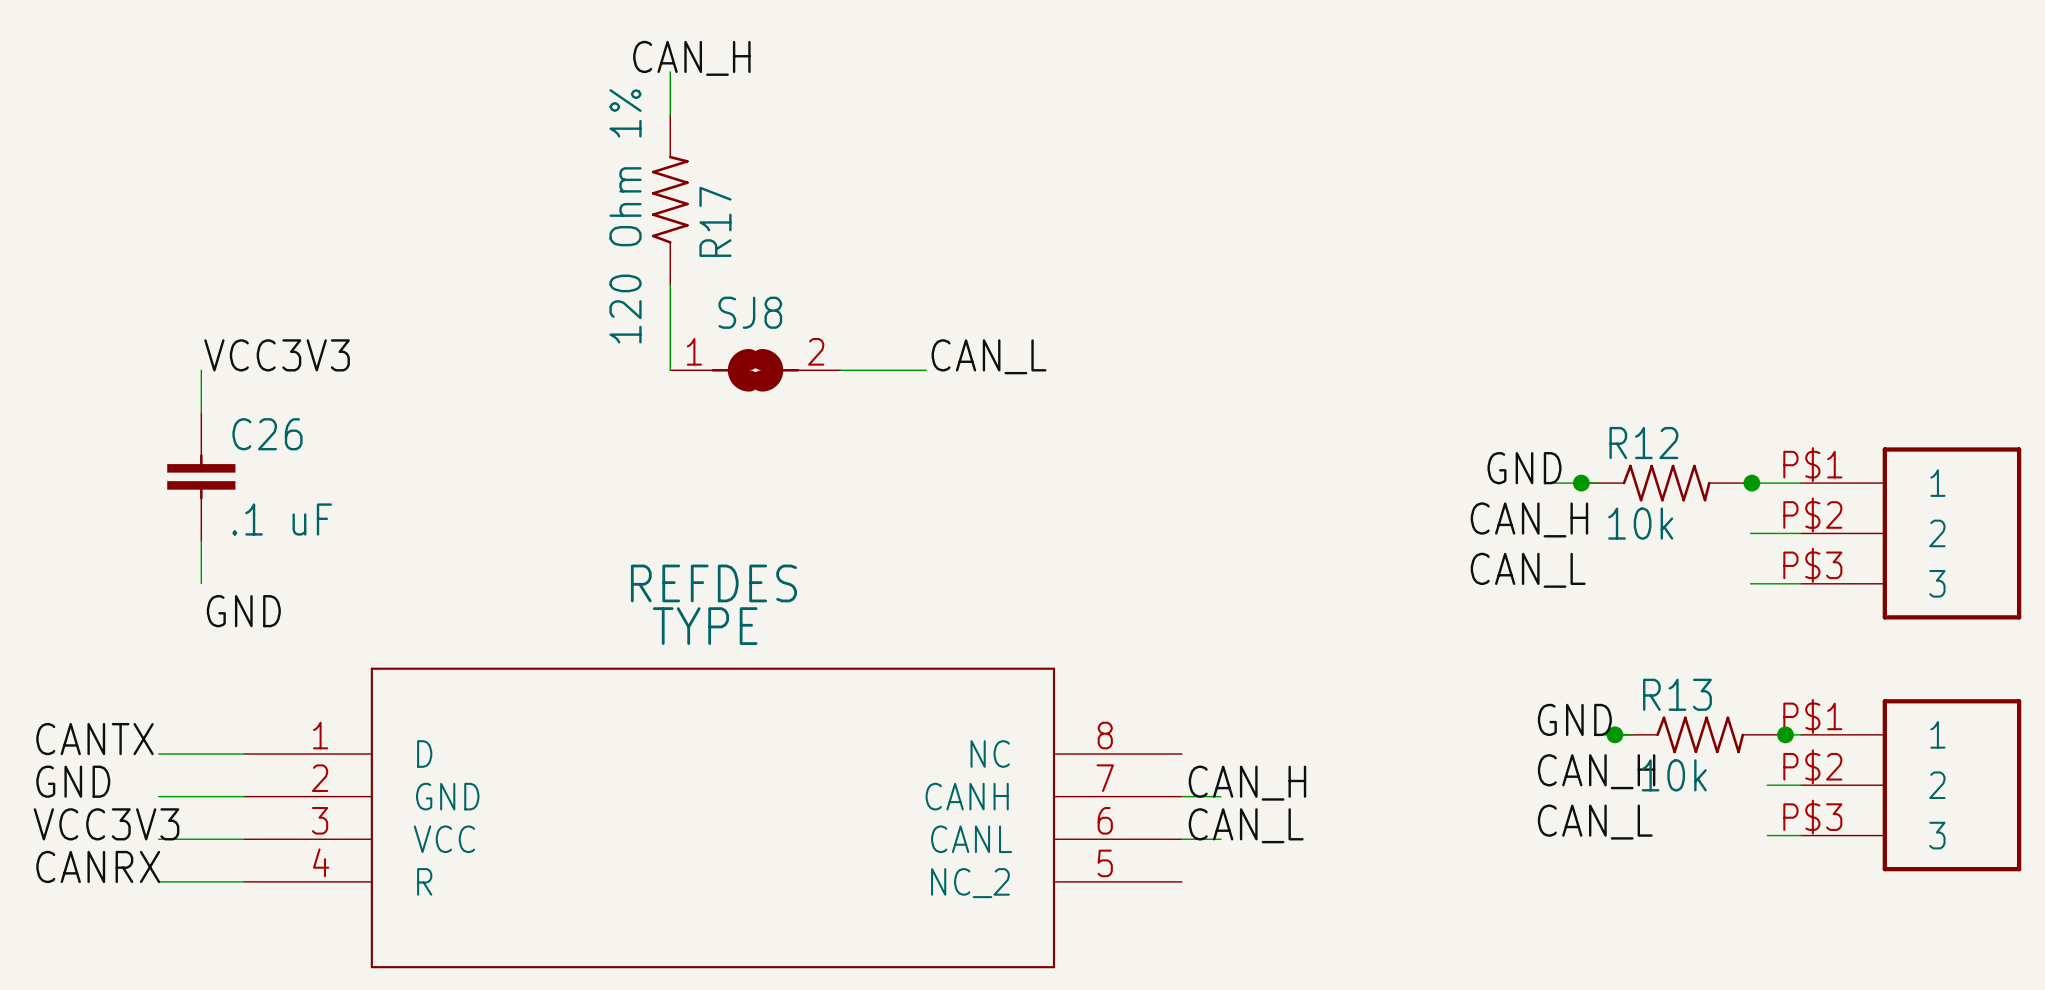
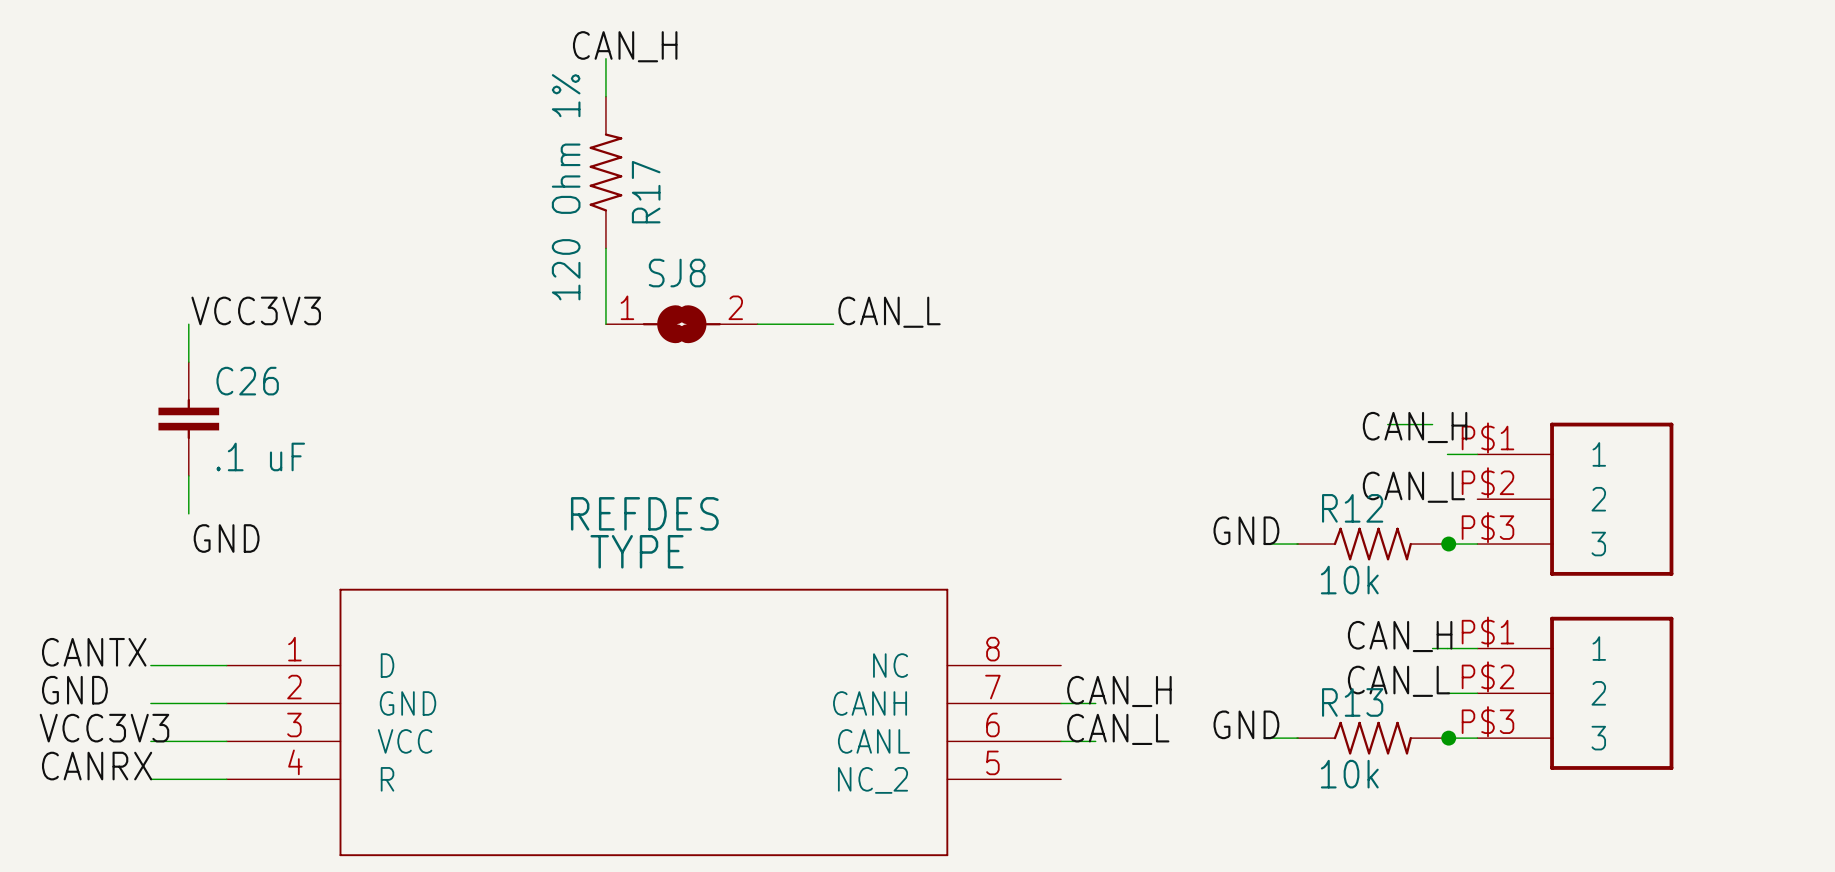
label: GND (1524, 468) -> none
junction: (1581, 483) -> none
R12 position: (1666, 483) -> (1372, 544)
junction: (1751, 483) -> none
wire: none -> (1447, 454) (1477, 454)
label position: CAN_H (1529, 519) -> CAN_H (1415, 427)
wire: (1750, 533) (1800, 533) -> none
part: (1911, 533) -> none
part: none -> (1575, 499)
label position: CAN_L (1528, 570) -> CAN_L (1413, 487)
wire: (1750, 583) (1800, 583) -> none
label: none -> GND (1246, 530)
wire: none -> (1268, 544) (1298, 544)
wire: none -> (1447, 544) (1477, 544)
junction: none -> (1448, 544)
label: GND (1574, 719) -> none
junction: (1614, 734) -> none
R13 position: (1700, 734) -> (1372, 738)
junction: (1785, 734) -> none
label position: CAN_H (1596, 771) -> CAN_H (1400, 636)
part: none -> (1575, 693)
wire: (1767, 785) (1800, 785) -> (1447, 693) (1477, 693)
part: (1911, 785) -> none
label: none -> GND (1246, 724)
label position: CAN_L (1595, 822) -> CAN_L (1399, 681)
wire: none -> (1268, 738) (1298, 738)
junction: none -> (1448, 738)
wire: (1767, 835) (1800, 835) -> (1447, 738) (1477, 738)

